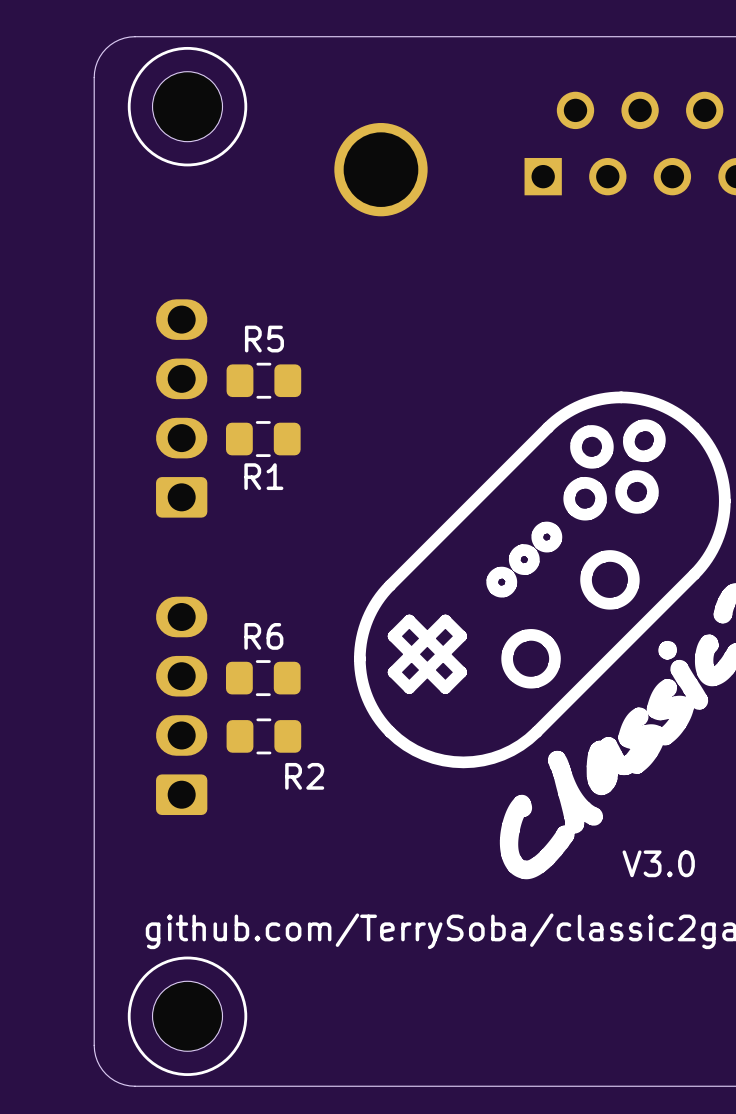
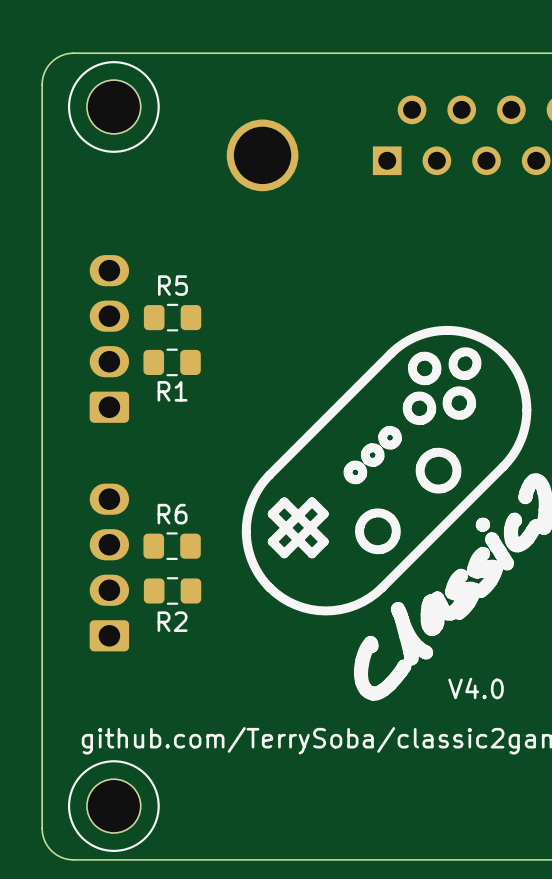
R2 name position: R2 (304, 776) -> R2 (172, 621)
text: V3.0 (658, 863) -> V4.0 (476, 688)

